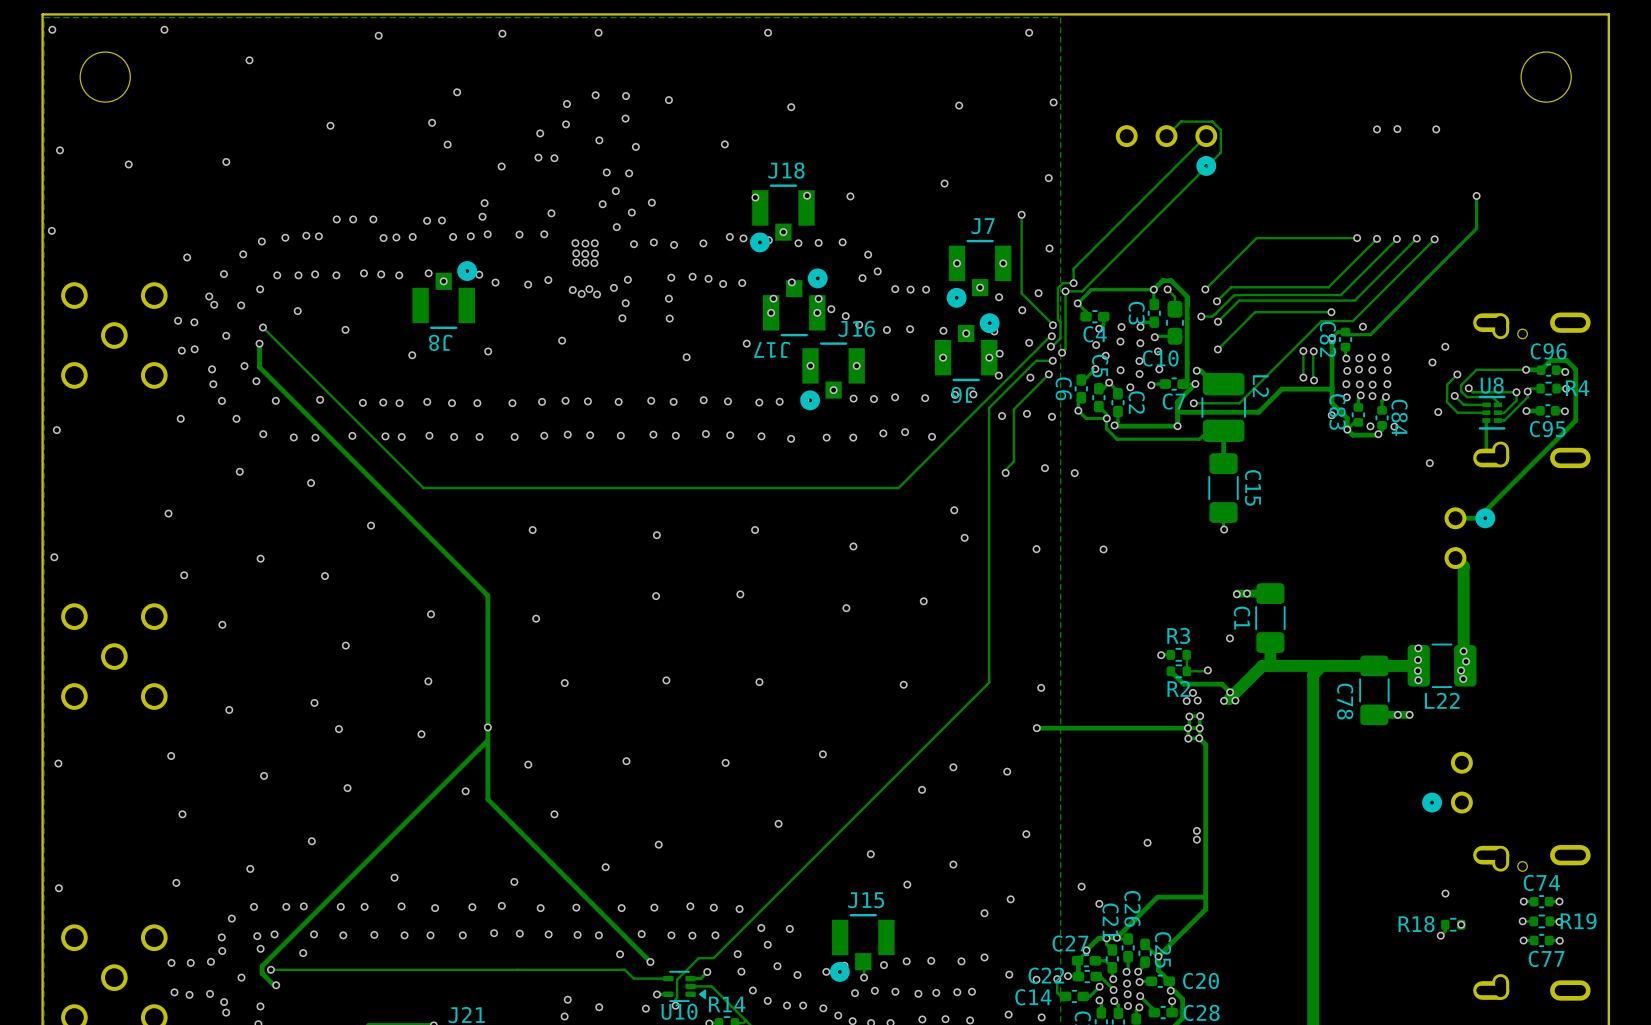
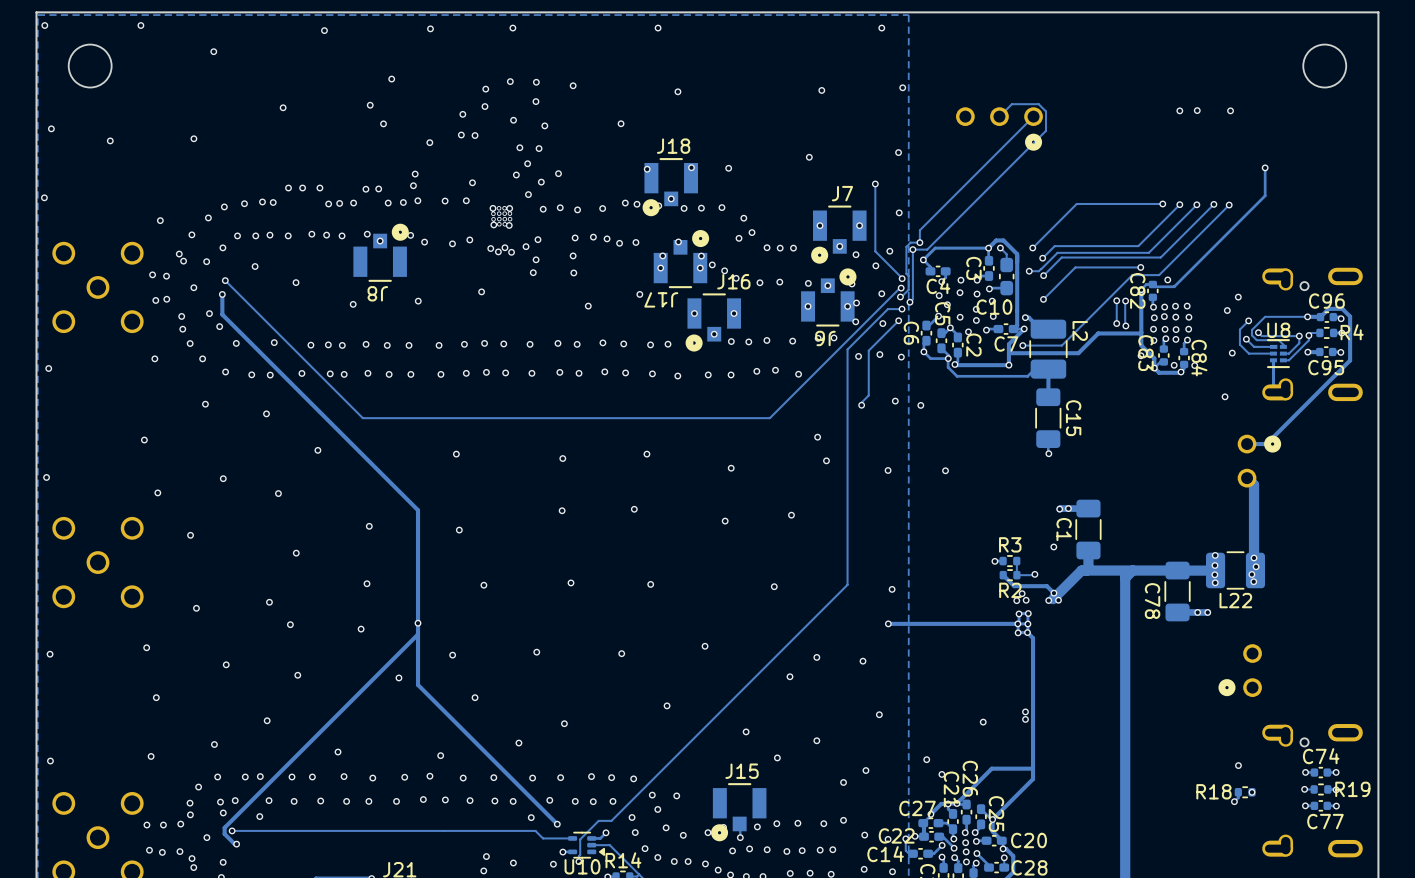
via: none -> (499, 208)
via: (585, 243) -> none
via: none -> (504, 208)
via: none -> (493, 213)
via: none -> (499, 213)
via: none -> (504, 213)
via: none -> (509, 213)
via: (576, 253) -> none
via: (585, 253) -> none
via: (595, 253) -> none
via: none -> (493, 219)
via: none -> (499, 219)
via: none -> (504, 219)
via: none -> (510, 219)
via: none -> (499, 224)
via: none -> (504, 224)
via: (585, 262) -> none

